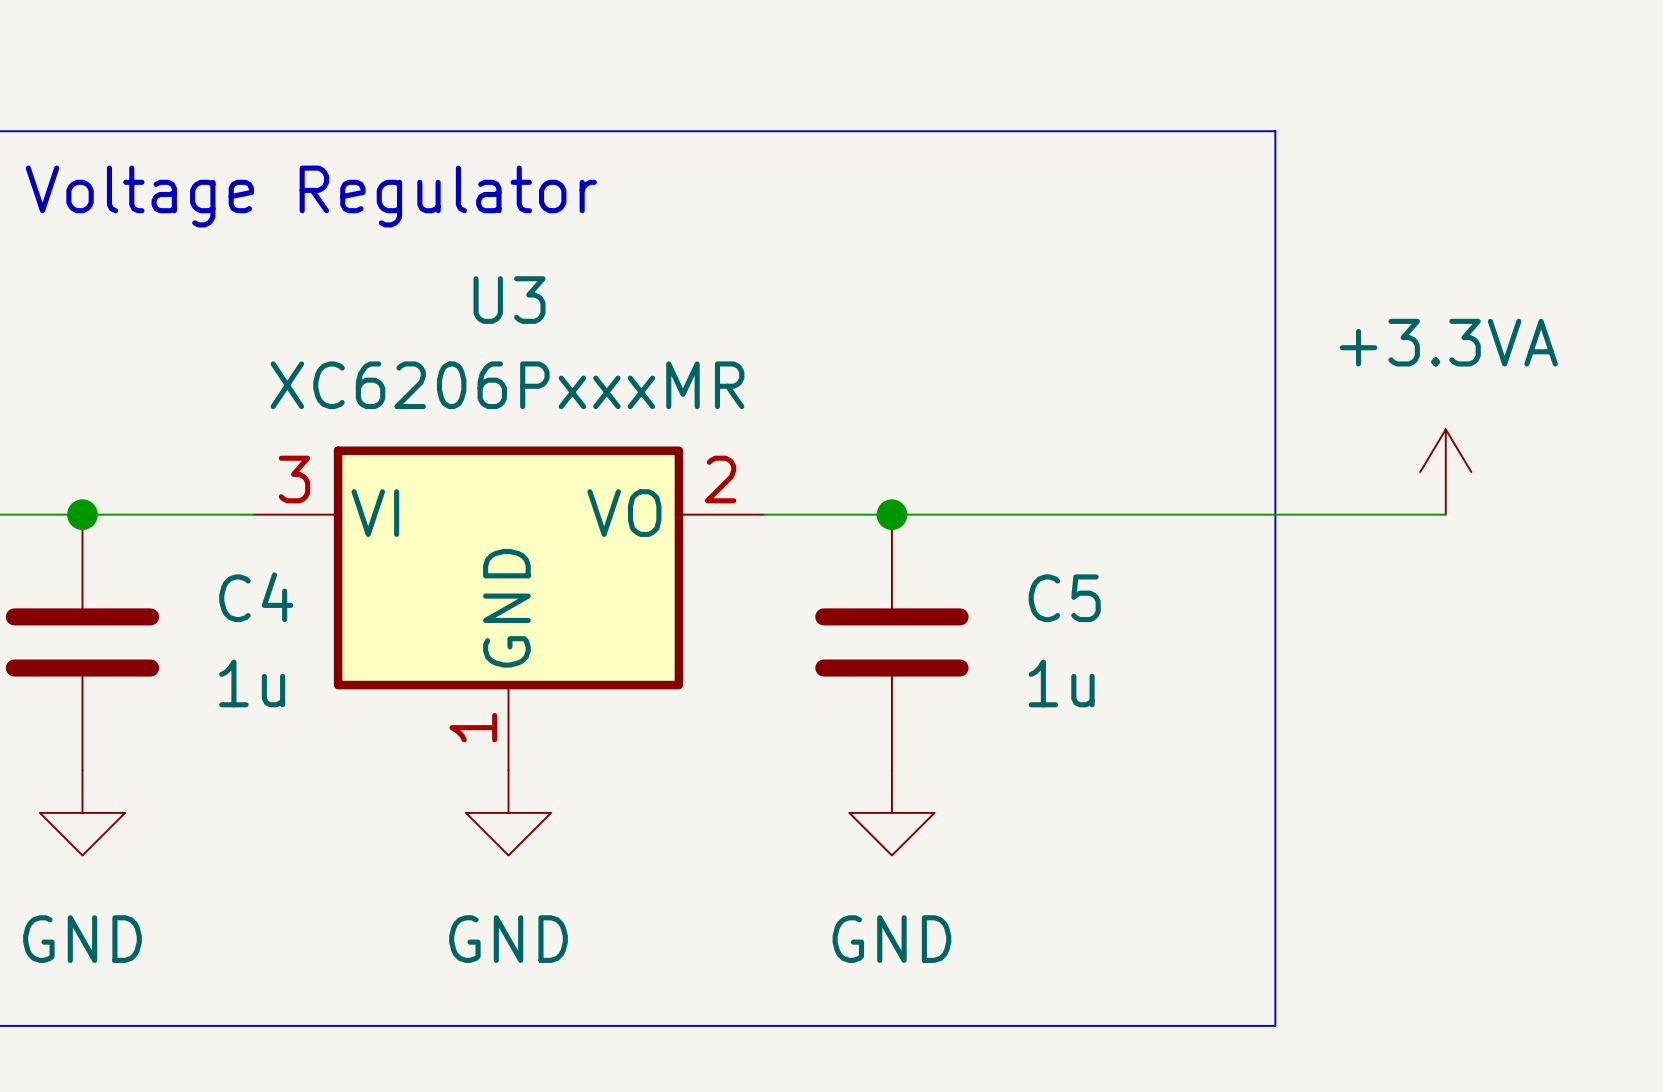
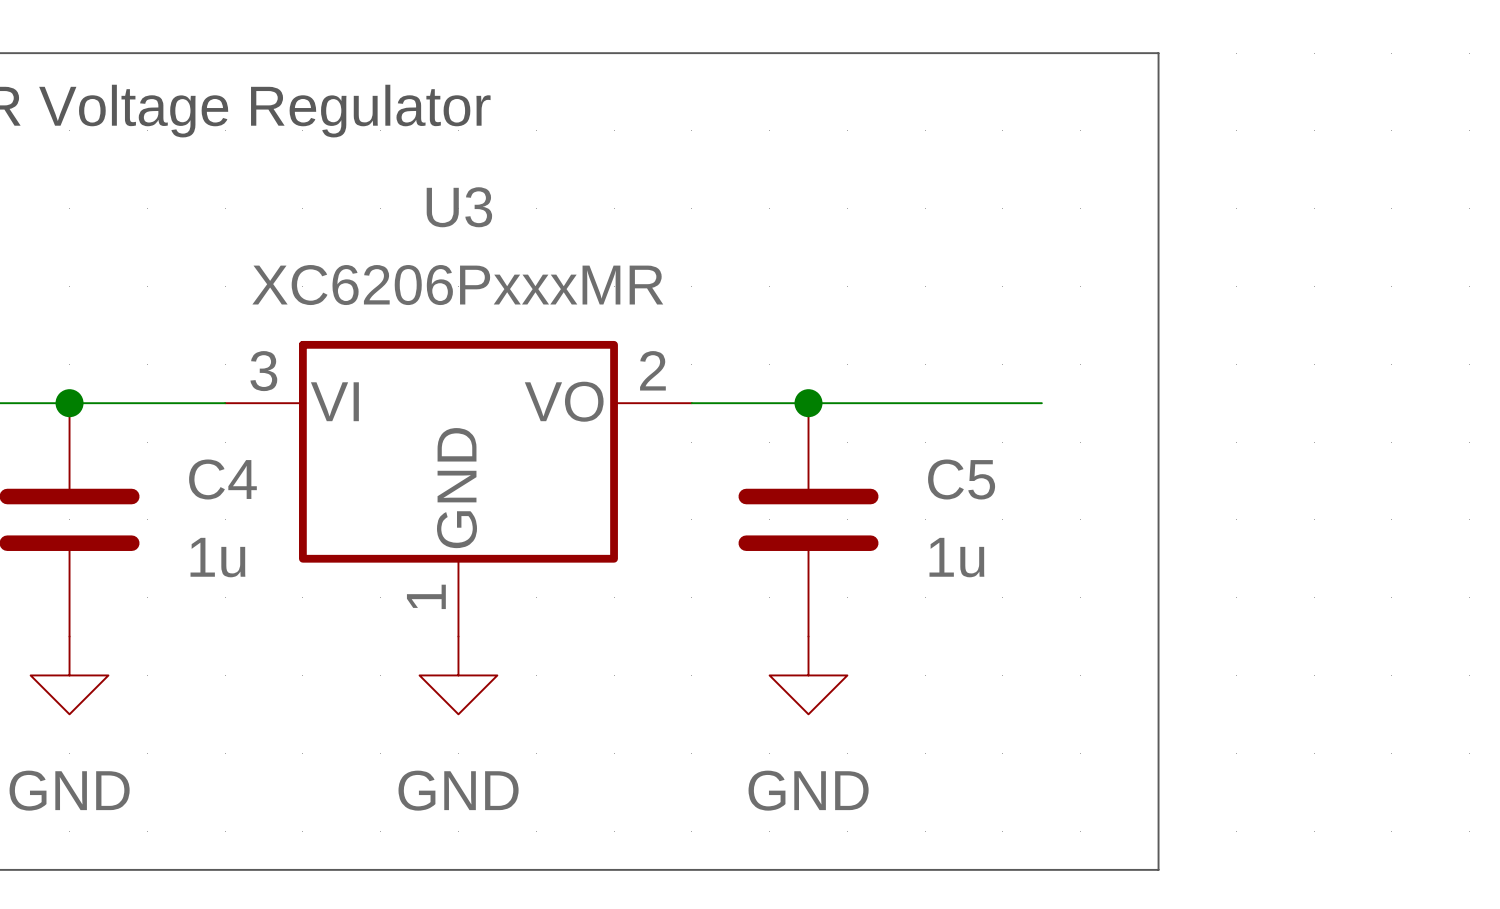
power symbol: +3.3VA (1445, 472) -> none
wire: (1147, 514) (1445, 514) -> none

